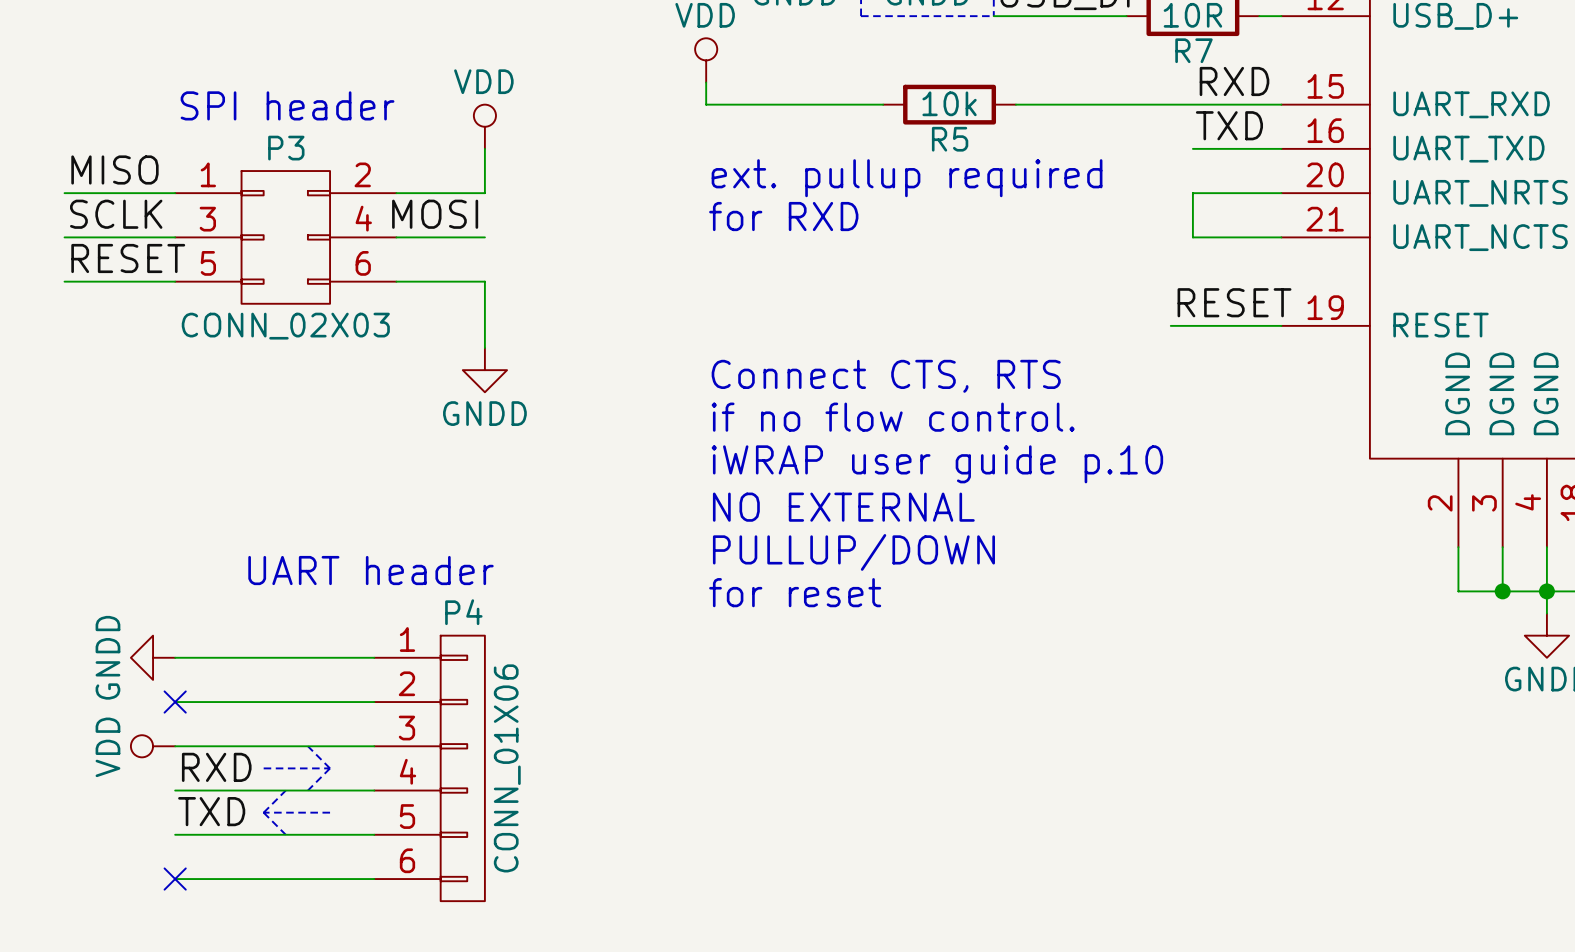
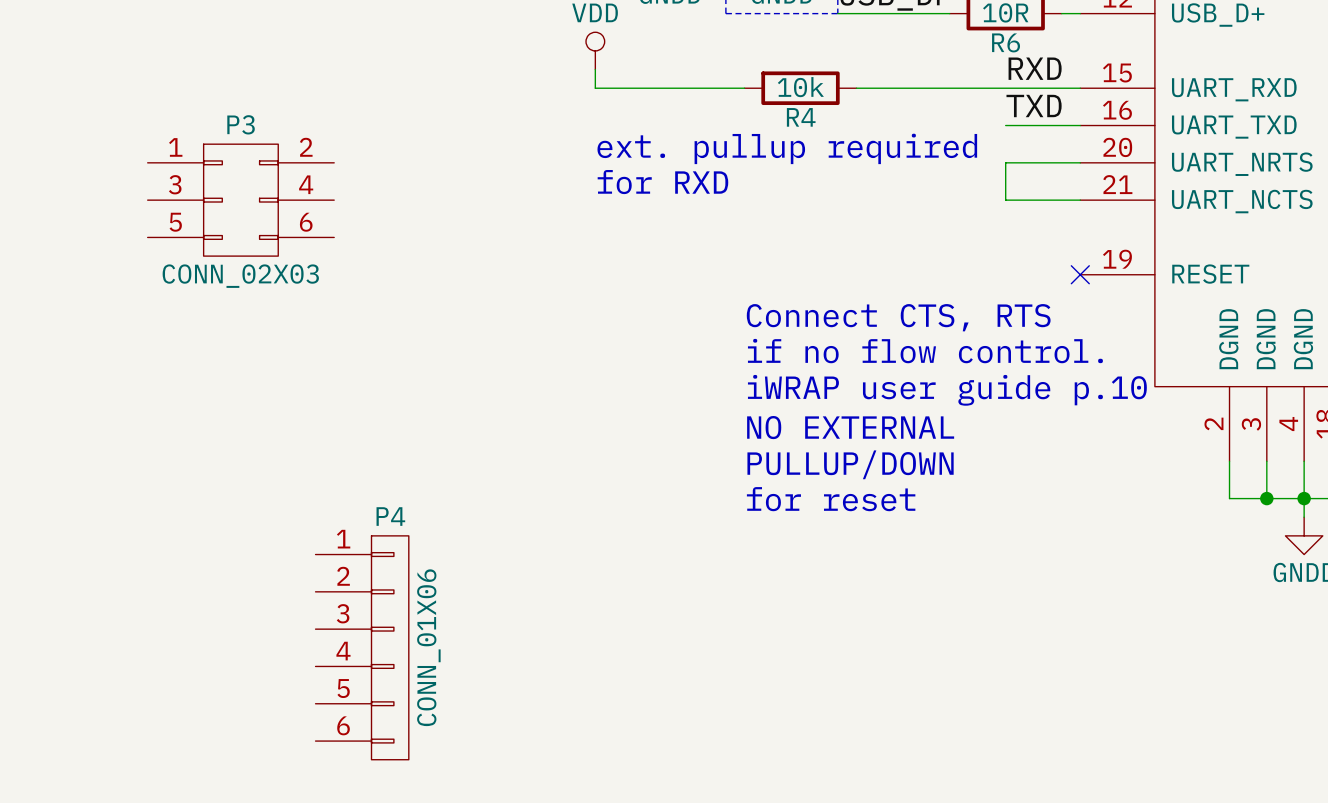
R7 name: R7 (1193, 50) -> R6 (1006, 42)
text: SPI header (287, 105) -> none
power symbol: VDD (484, 126) -> none
R5 name: R5 (950, 139) -> R4 (801, 117)
wire: (484, 148) (484, 193) (396, 193) -> none
label: MISO (114, 169) -> none
wire: (64, 193) (175, 193) -> none
label: SCLK (116, 214) -> none
label: MOSI (435, 214) -> none
wire: (64, 237) (175, 237) -> none
wire: (396, 237) (484, 237) -> none
label: RESET (128, 258) -> none
wire: (64, 281) (175, 281) -> none
wire: (396, 281) (484, 281) (484, 348) -> none
label: RESET (1234, 302) -> none
wire: (1170, 325) (1281, 325) -> none
no-connect mark: none -> (1080, 274)
power symbol: GNDD (484, 370) -> none
text position: Connect CTS, RTS (886, 376) -> Connect CTS, RTS (898, 317)
text position: if no flow control. (893, 417) -> if no flow control. (925, 351)
text position: iWRAP user guide p.10 (937, 464) -> iWRAP user guide p.10 (947, 390)
text position: NO EXTERNAL (843, 507) -> NO EXTERNAL (850, 427)
text position: PULLUP/DOWN (853, 552) -> PULLUP/DOWN (850, 464)
text: UART header (370, 570) -> none
text position: for reset (795, 592) -> for reset (831, 499)
power symbol: GNDD (153, 657) -> none
wire: (175, 657) (374, 657) -> none
wire: (175, 702) (374, 702) -> none
no-connect mark: (175, 702) -> none
power symbol: VDD (153, 746) -> none
wire: (175, 746) (374, 746) -> none
line: (307, 746) (330, 768) -> none
label: RXD (216, 767) -> none
line: (263, 768) (330, 768) -> none
line: (330, 768) (307, 790) -> none
wire: (175, 790) (374, 790) -> none
line: (285, 790) (263, 812) -> none
label: TXD (211, 811) -> none
line: (263, 812) (330, 812) -> none
line: (263, 812) (285, 834) -> none
wire: (175, 834) (374, 834) -> none
wire: (175, 879) (374, 879) -> none
no-connect mark: (175, 879) -> none

